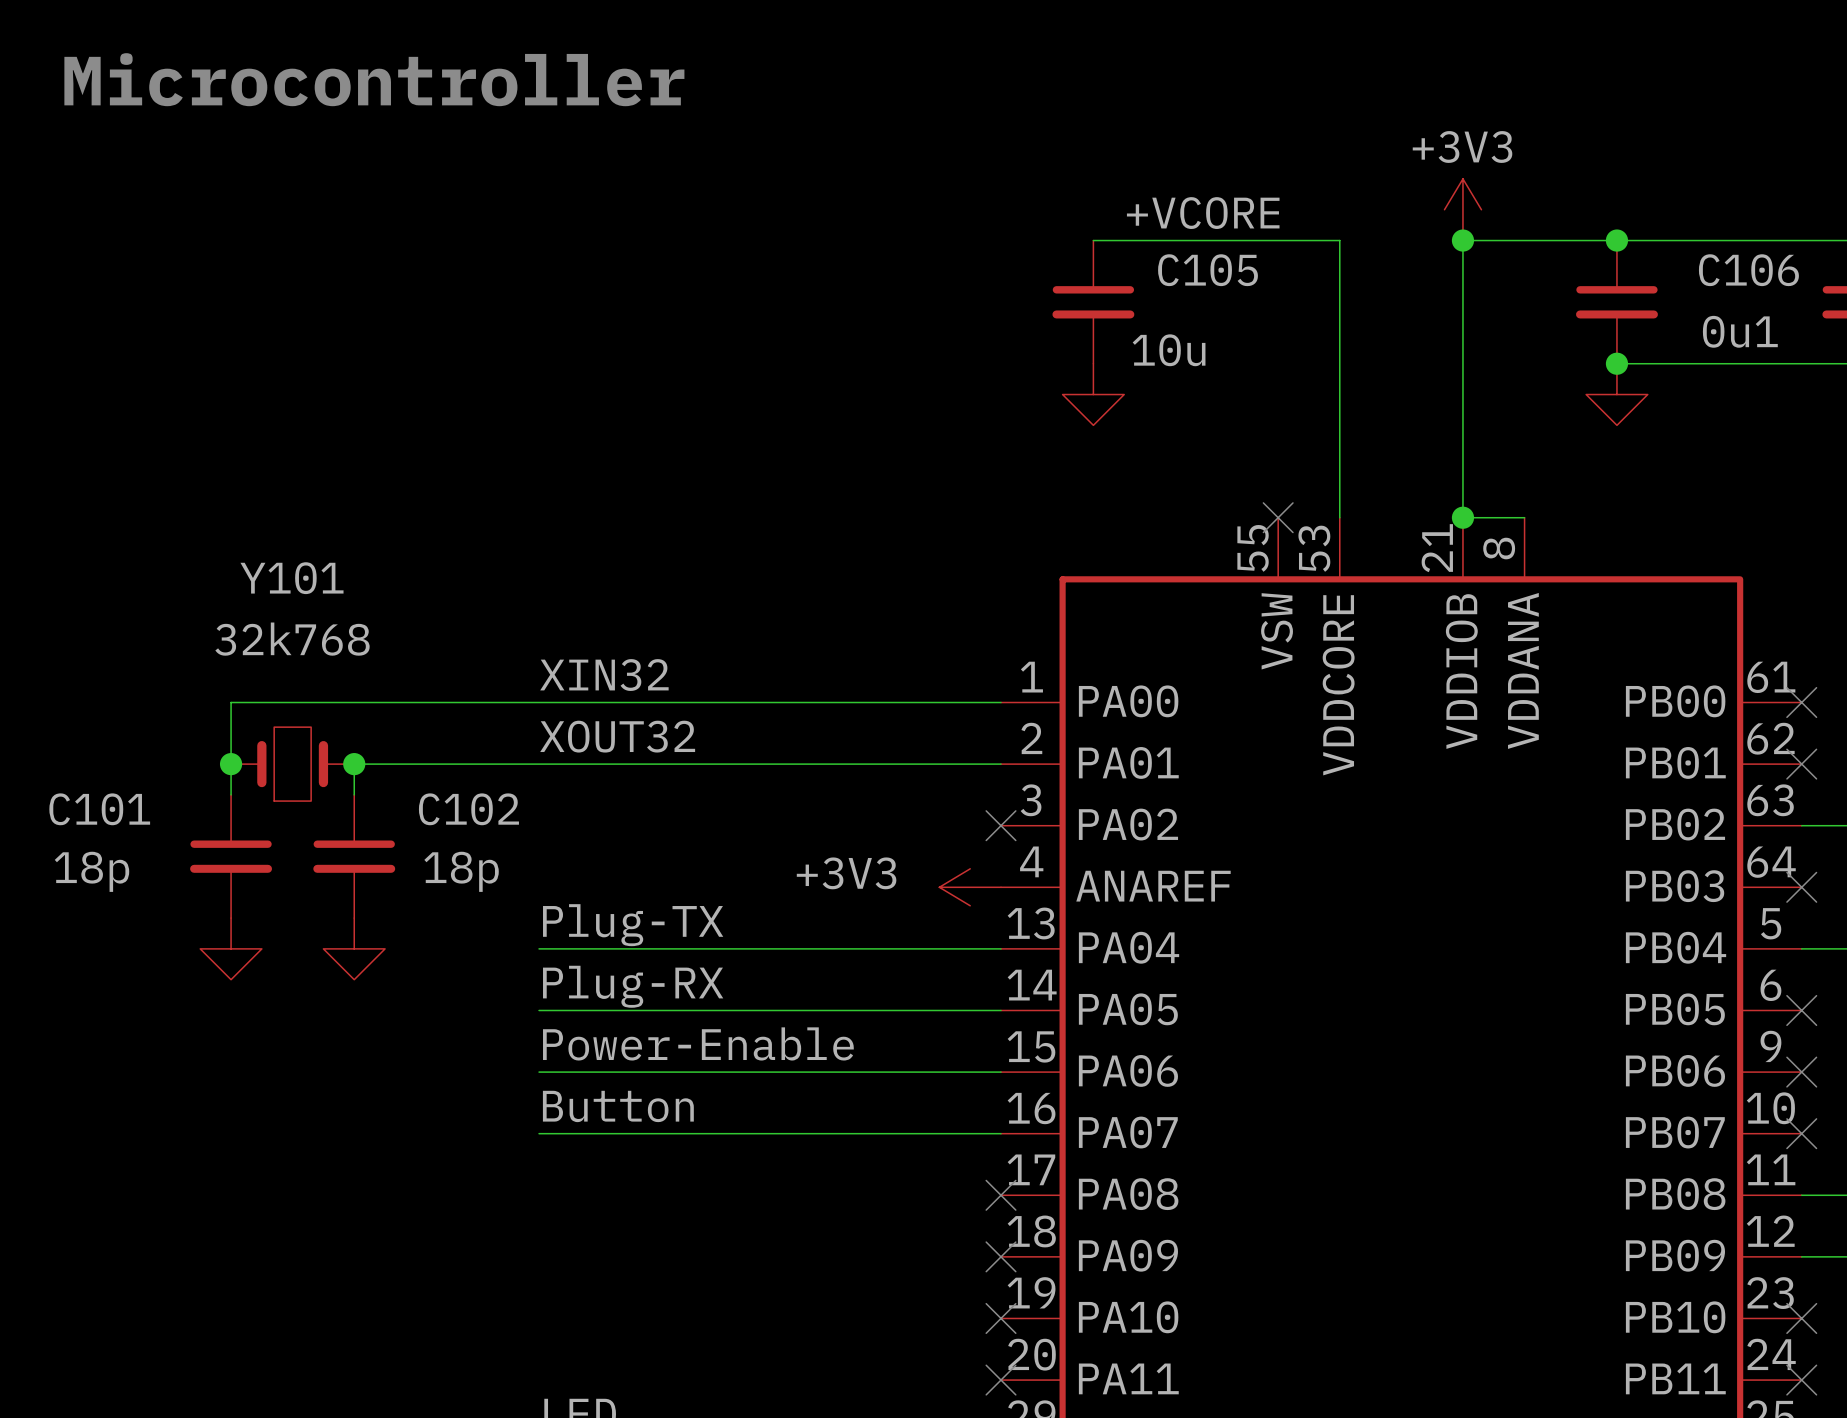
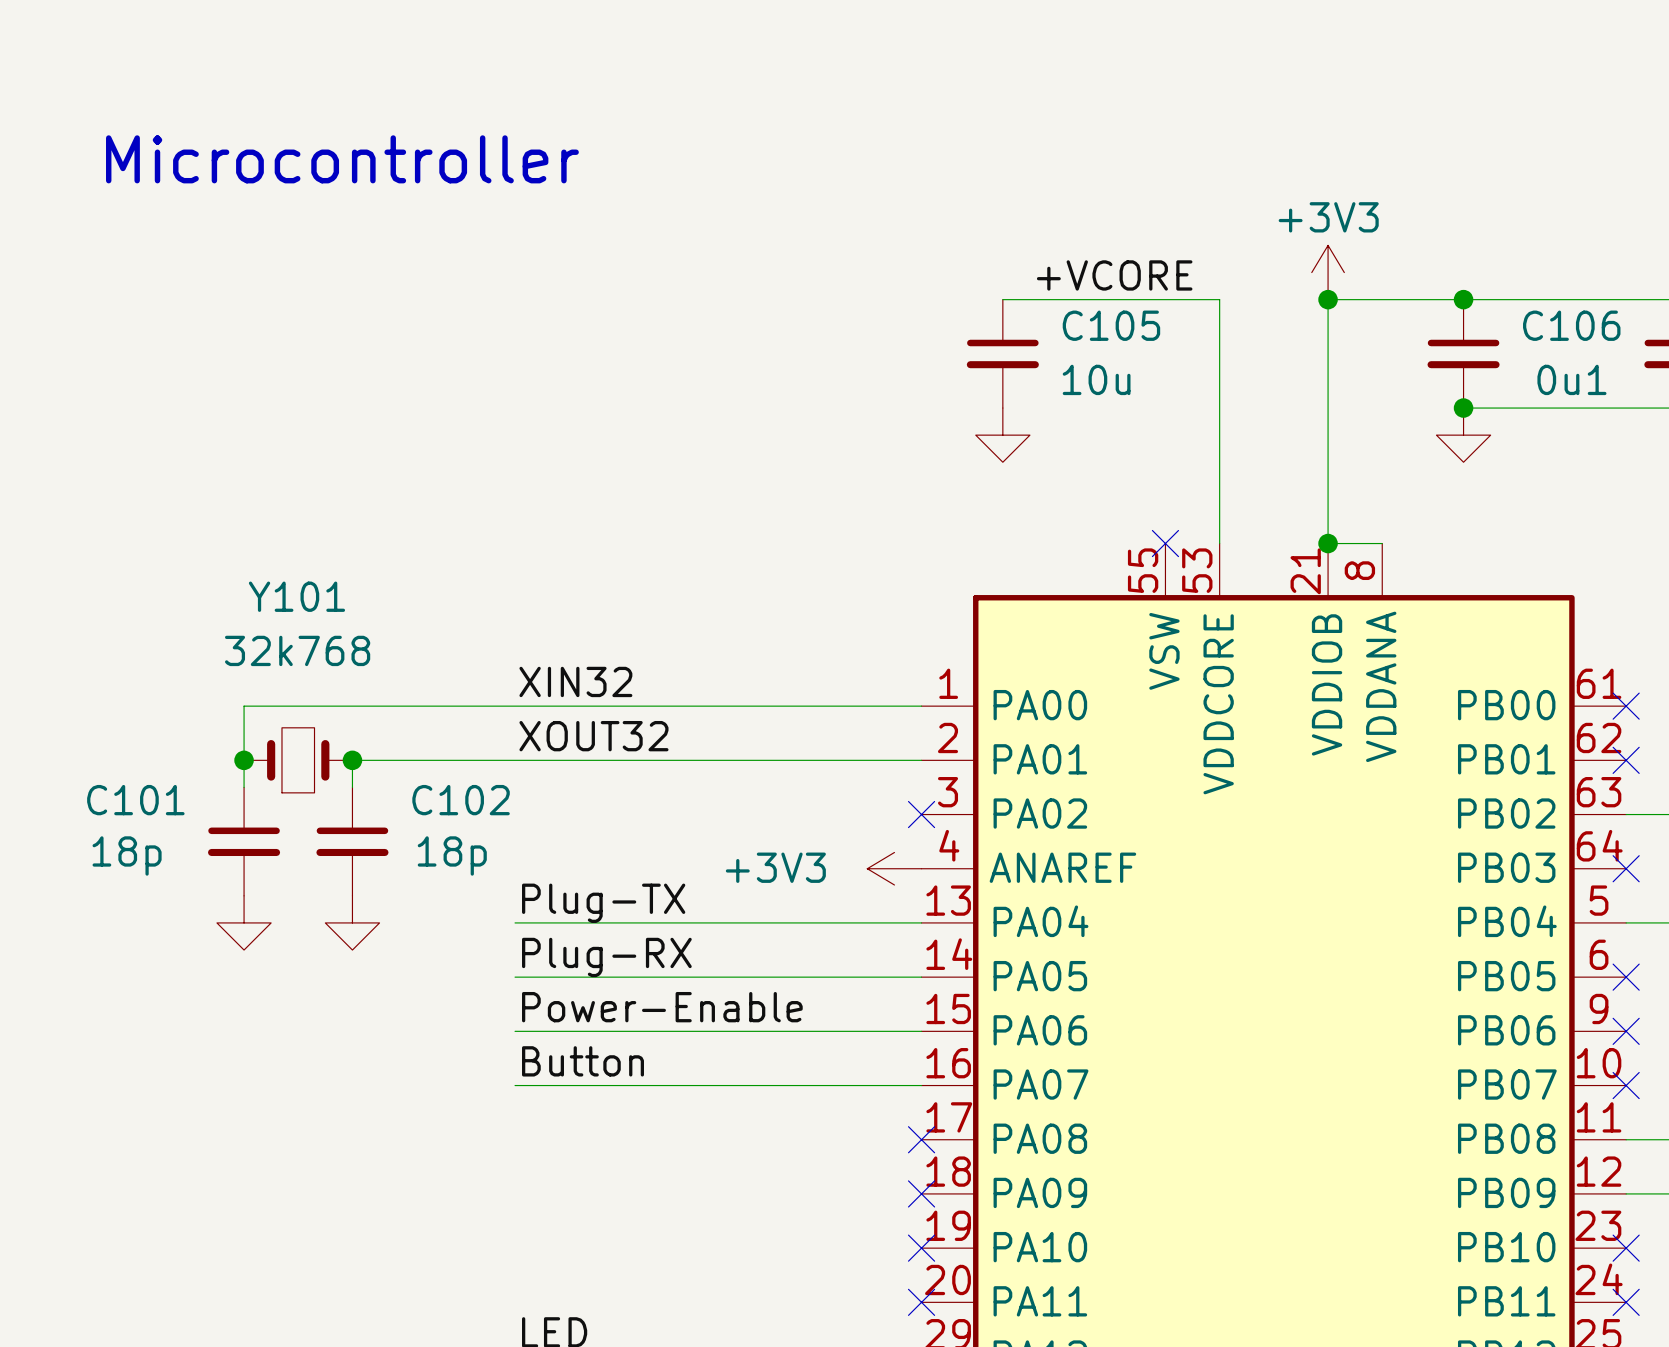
C105 value position: 10u (1169, 350) -> 10u (1096, 379)
power symbol text position: +3V3 (846, 873) -> +3V3 (775, 867)

